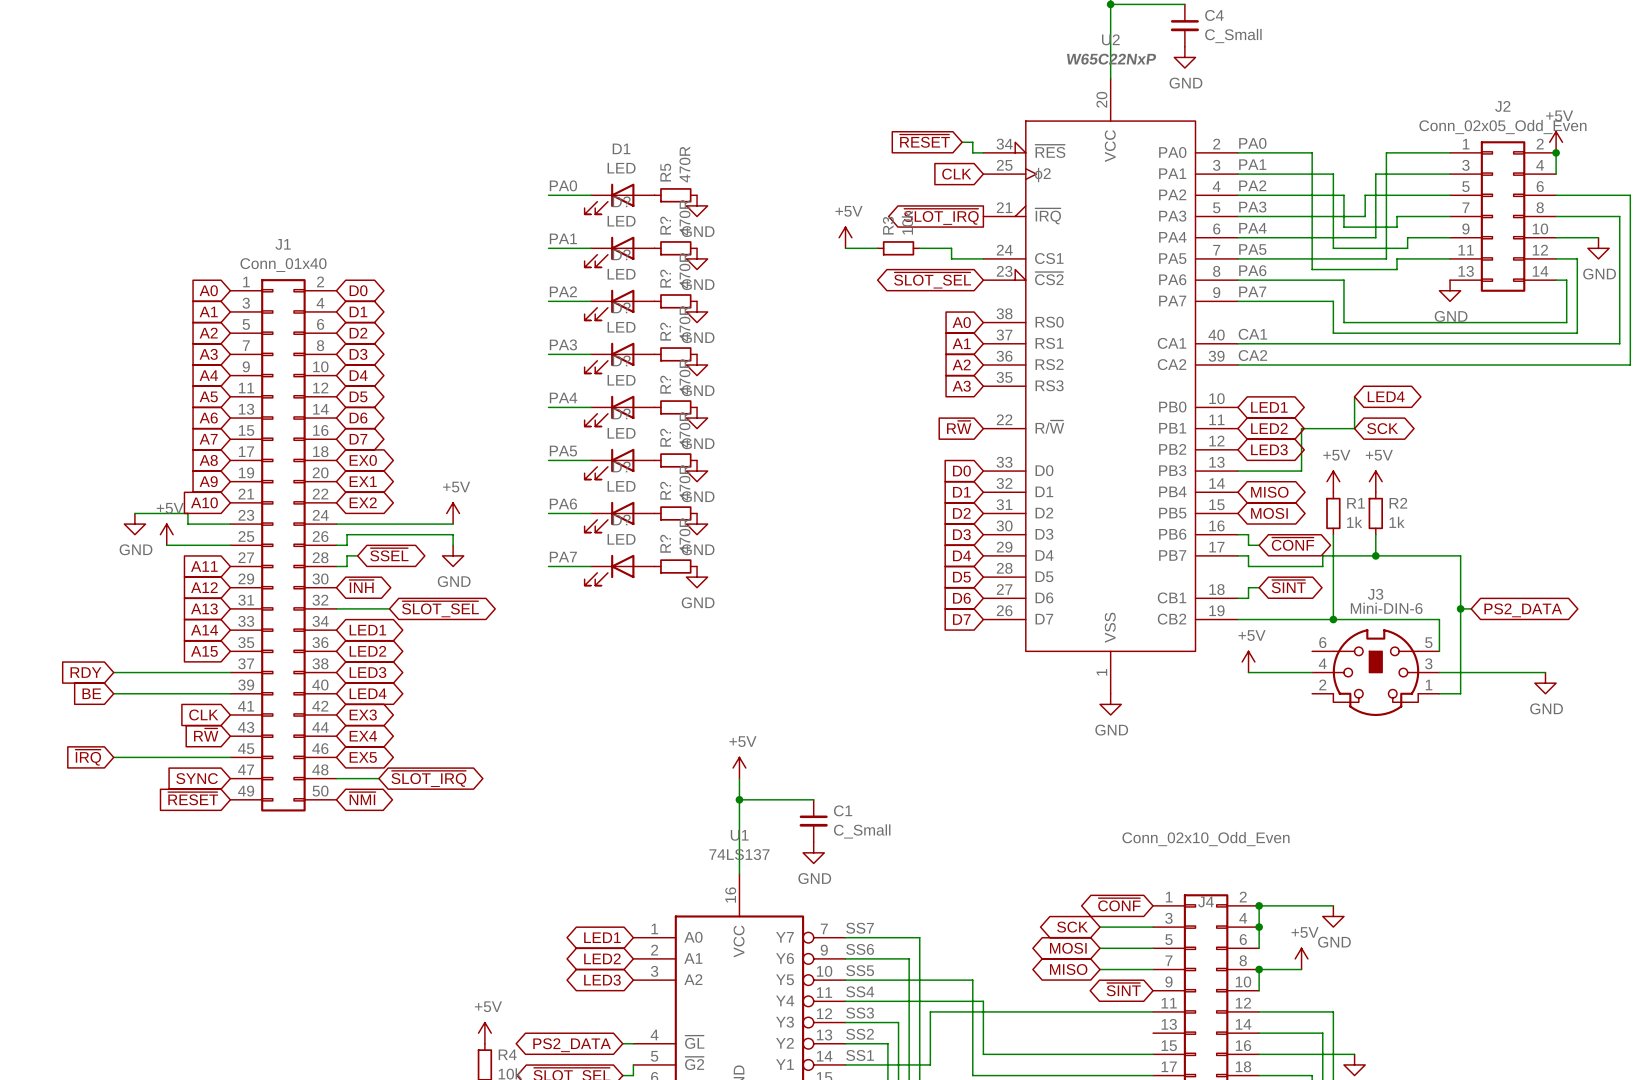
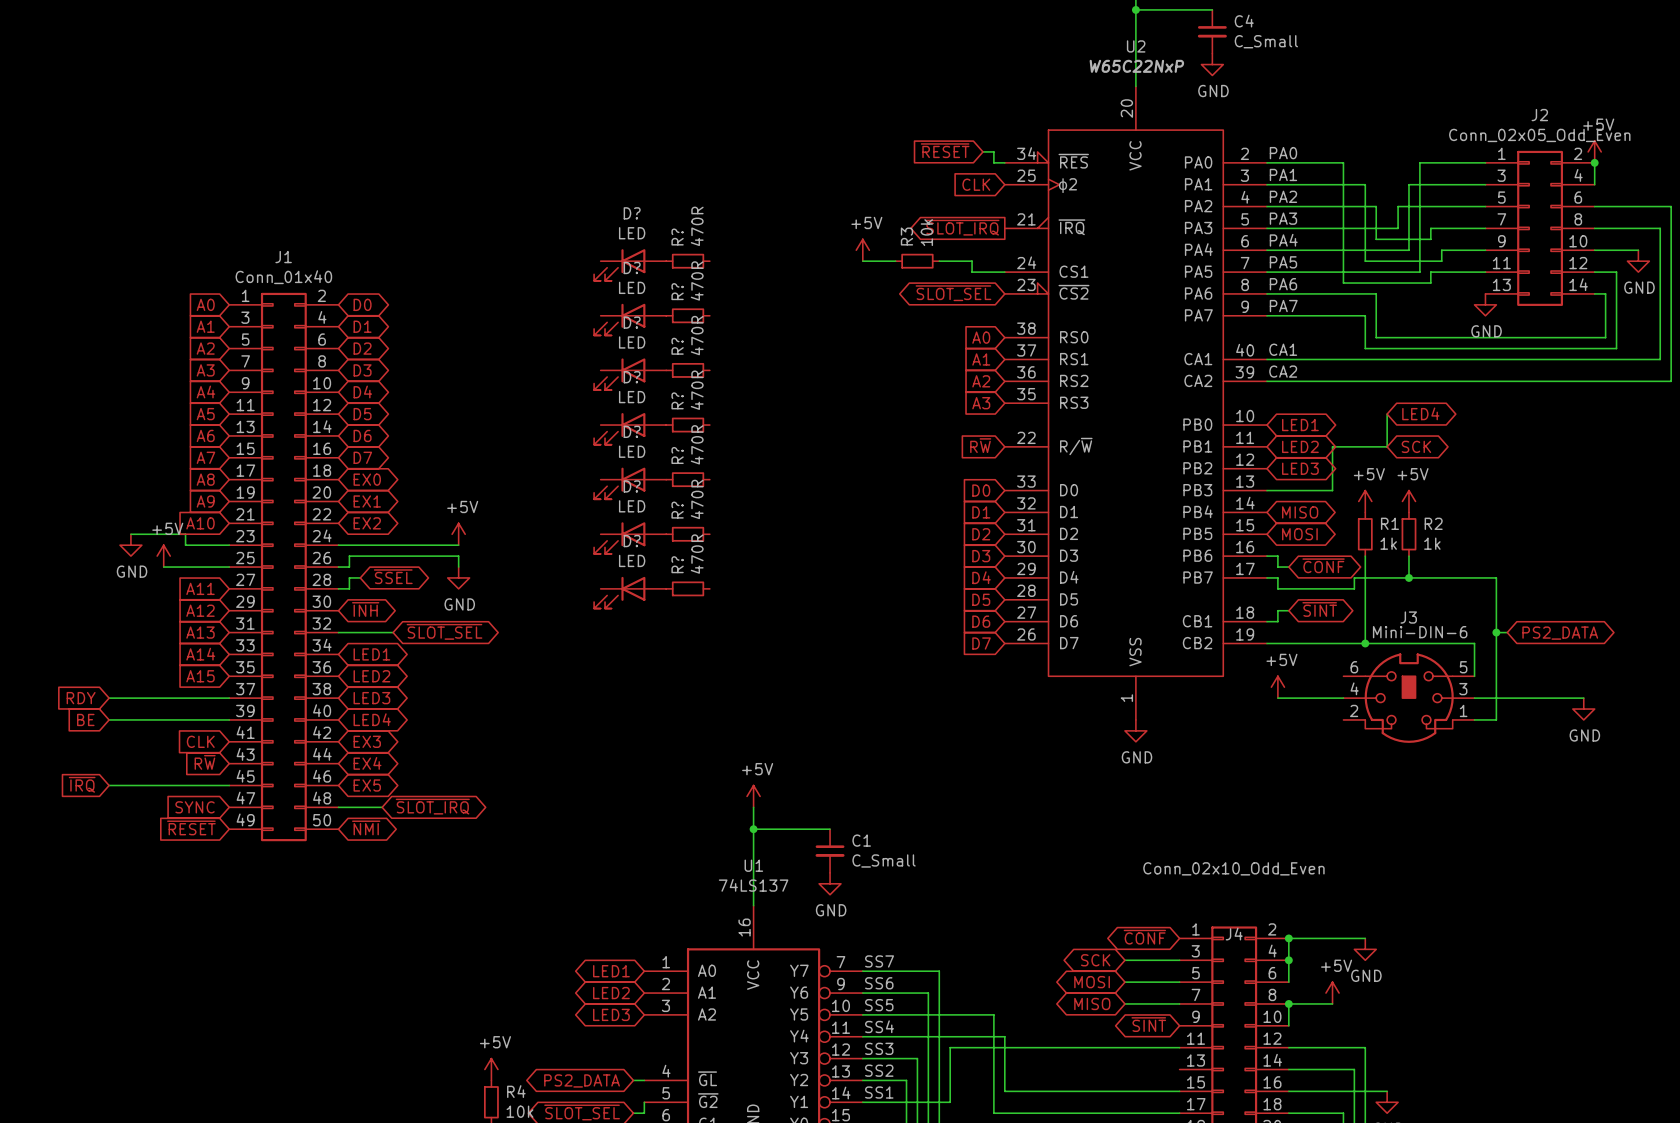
label: PA0 (563, 185) -> none
wire: (548, 195) (590, 195) -> none
R5: 470R (675, 195) -> none
D1: LED (619, 199) -> none
power symbol: GND (697, 205) -> none
label: PA1 (563, 238) -> none
wire: (548, 248) (590, 248) -> none
power symbol: GND (697, 258) -> none
label: PA2 (563, 291) -> none
wire: (548, 301) (590, 301) -> none
power symbol: GND (697, 311) -> none
label: PA3 (563, 344) -> none
wire: (548, 354) (590, 354) -> none
power symbol: GND (697, 364) -> none
label: PA4 (563, 397) -> none
wire: (548, 407) (590, 407) -> none
power symbol: GND (697, 418) -> none
label: PA5 (563, 451) -> none
wire: (548, 460) (590, 460) -> none
power symbol: GND (697, 471) -> none
label: PA6 (563, 504) -> none
wire: (548, 513) (590, 513) -> none
power symbol: GND (697, 524) -> none
label: PA7 (563, 557) -> none
wire: (548, 566) (590, 566) -> none
power symbol: GND (697, 577) -> none

